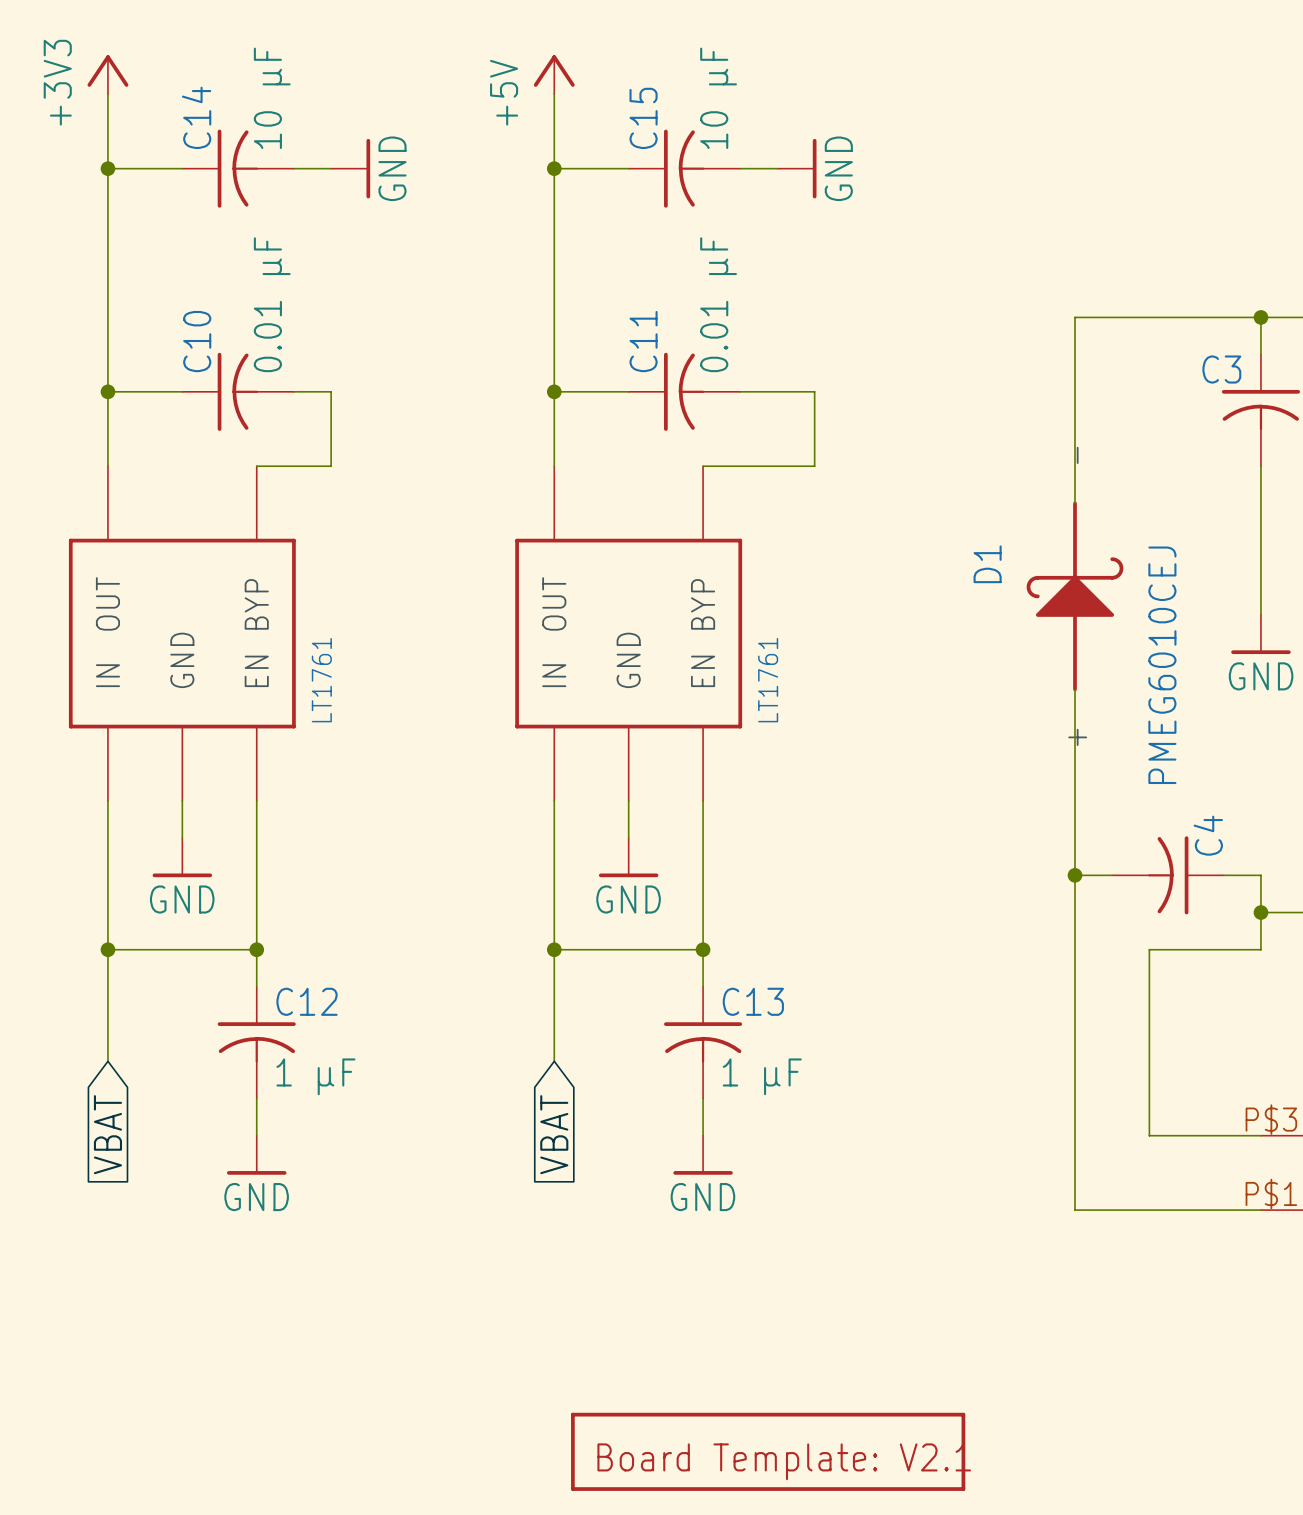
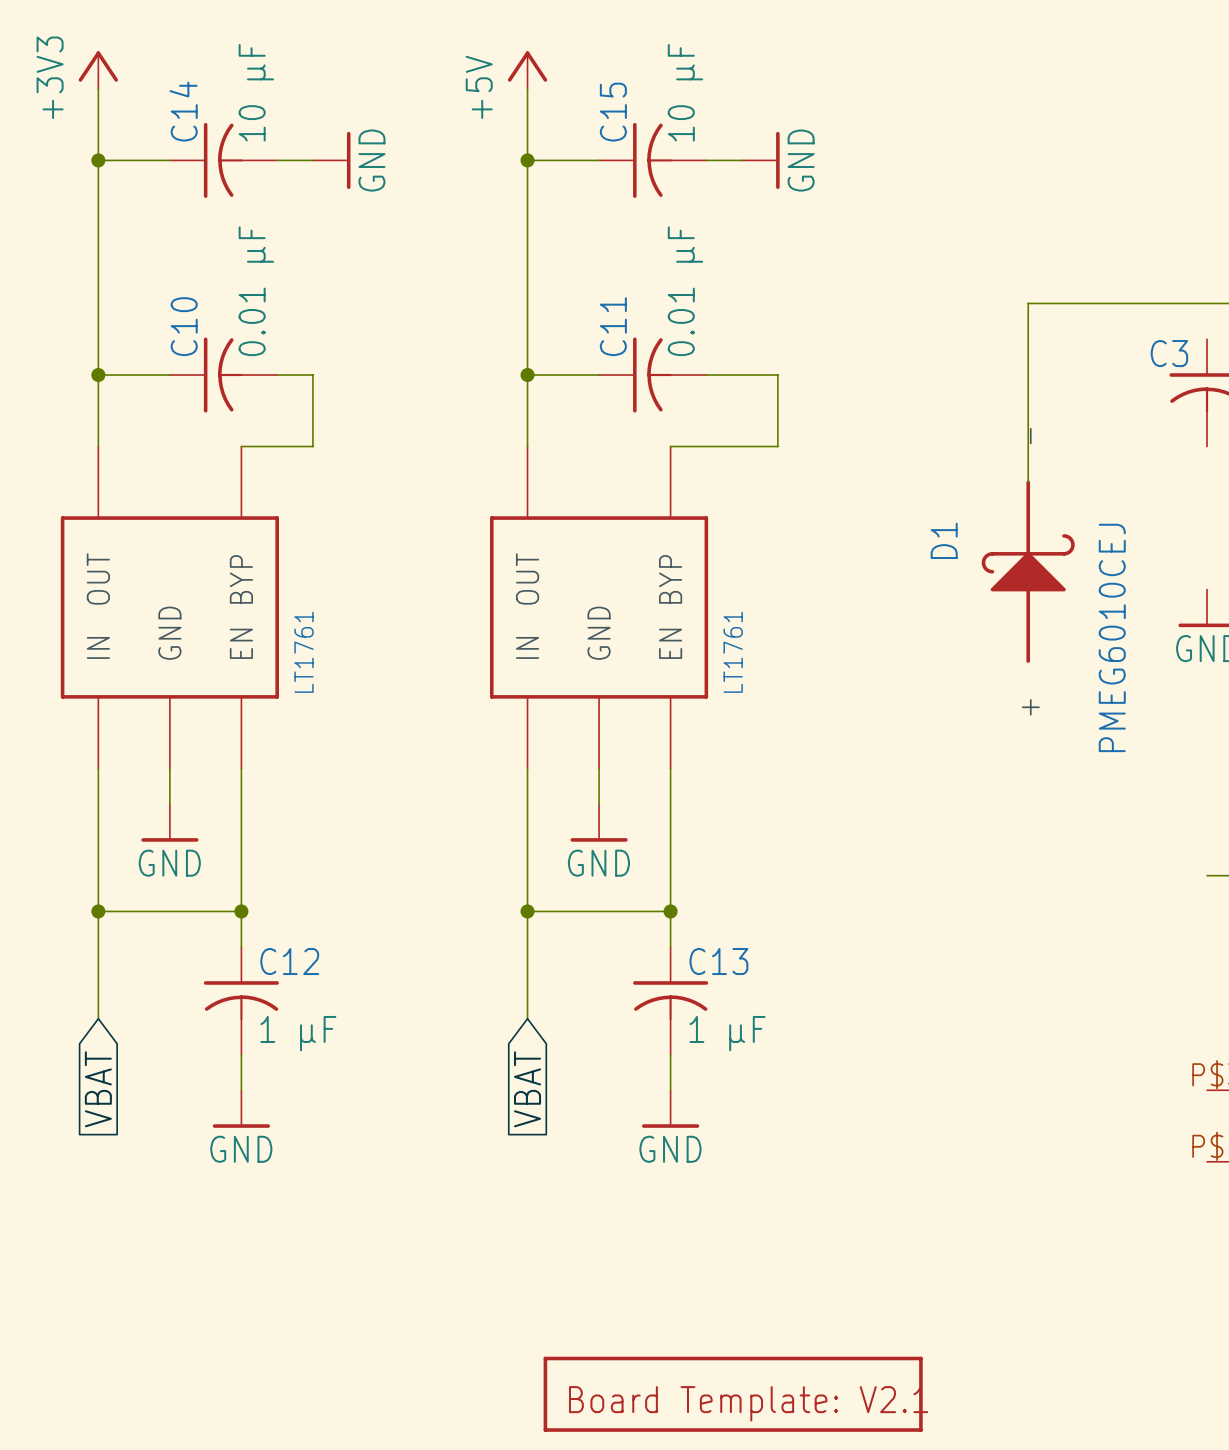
wire: (1260, 317) (1260, 354) -> none
junction: (1260, 317) -> none
wire: (1260, 466) (1260, 614) -> none
wire: (1075, 689) (1075, 1210) (1260, 1210) -> none
wire: (1075, 875) (1112, 875) -> none
junction: (1075, 875) -> none
C4: (1167, 875) -> none
wire: (1223, 875) (1260, 875) (1260, 949) (1149, 949) (1149, 1135) (1260, 1135) -> none
junction: (1260, 912) -> none

